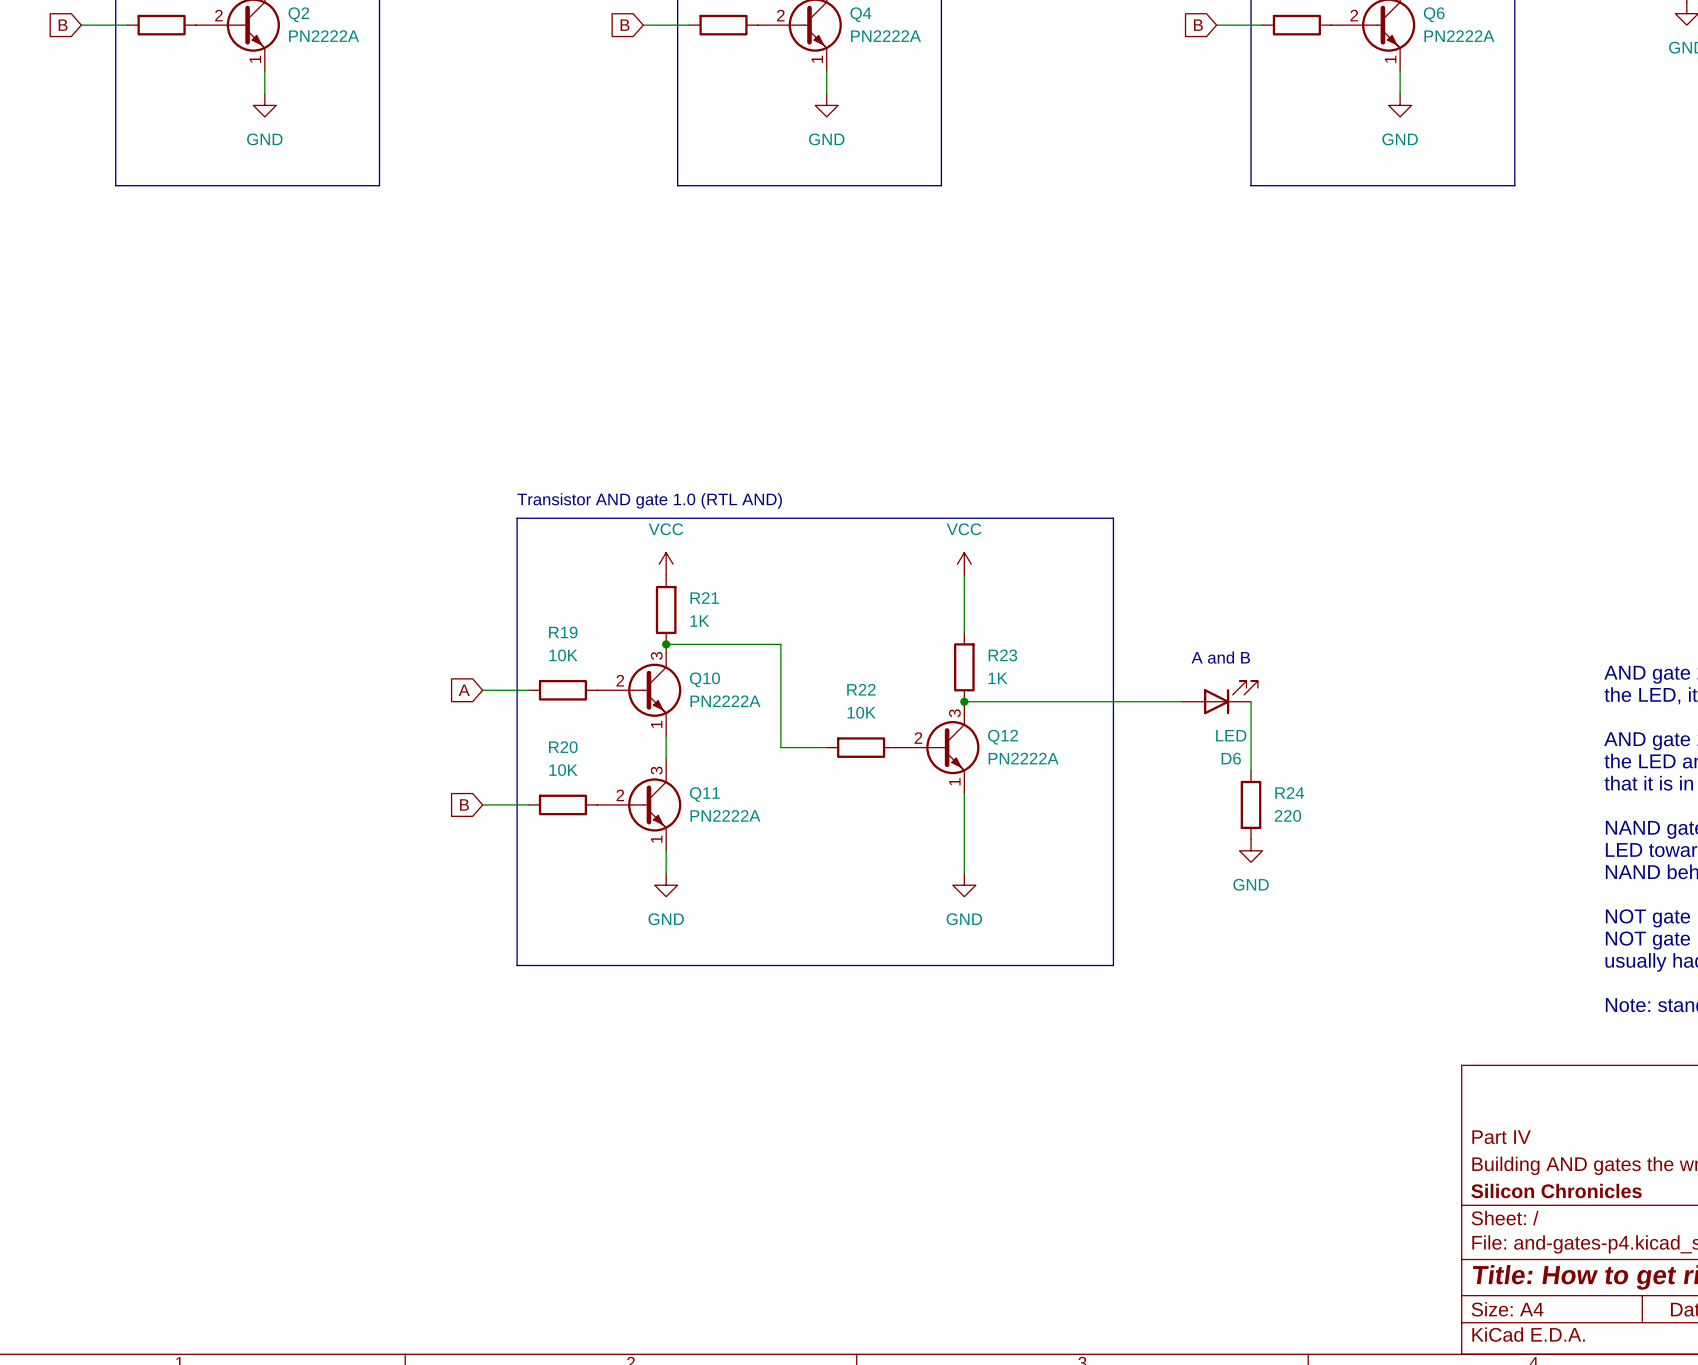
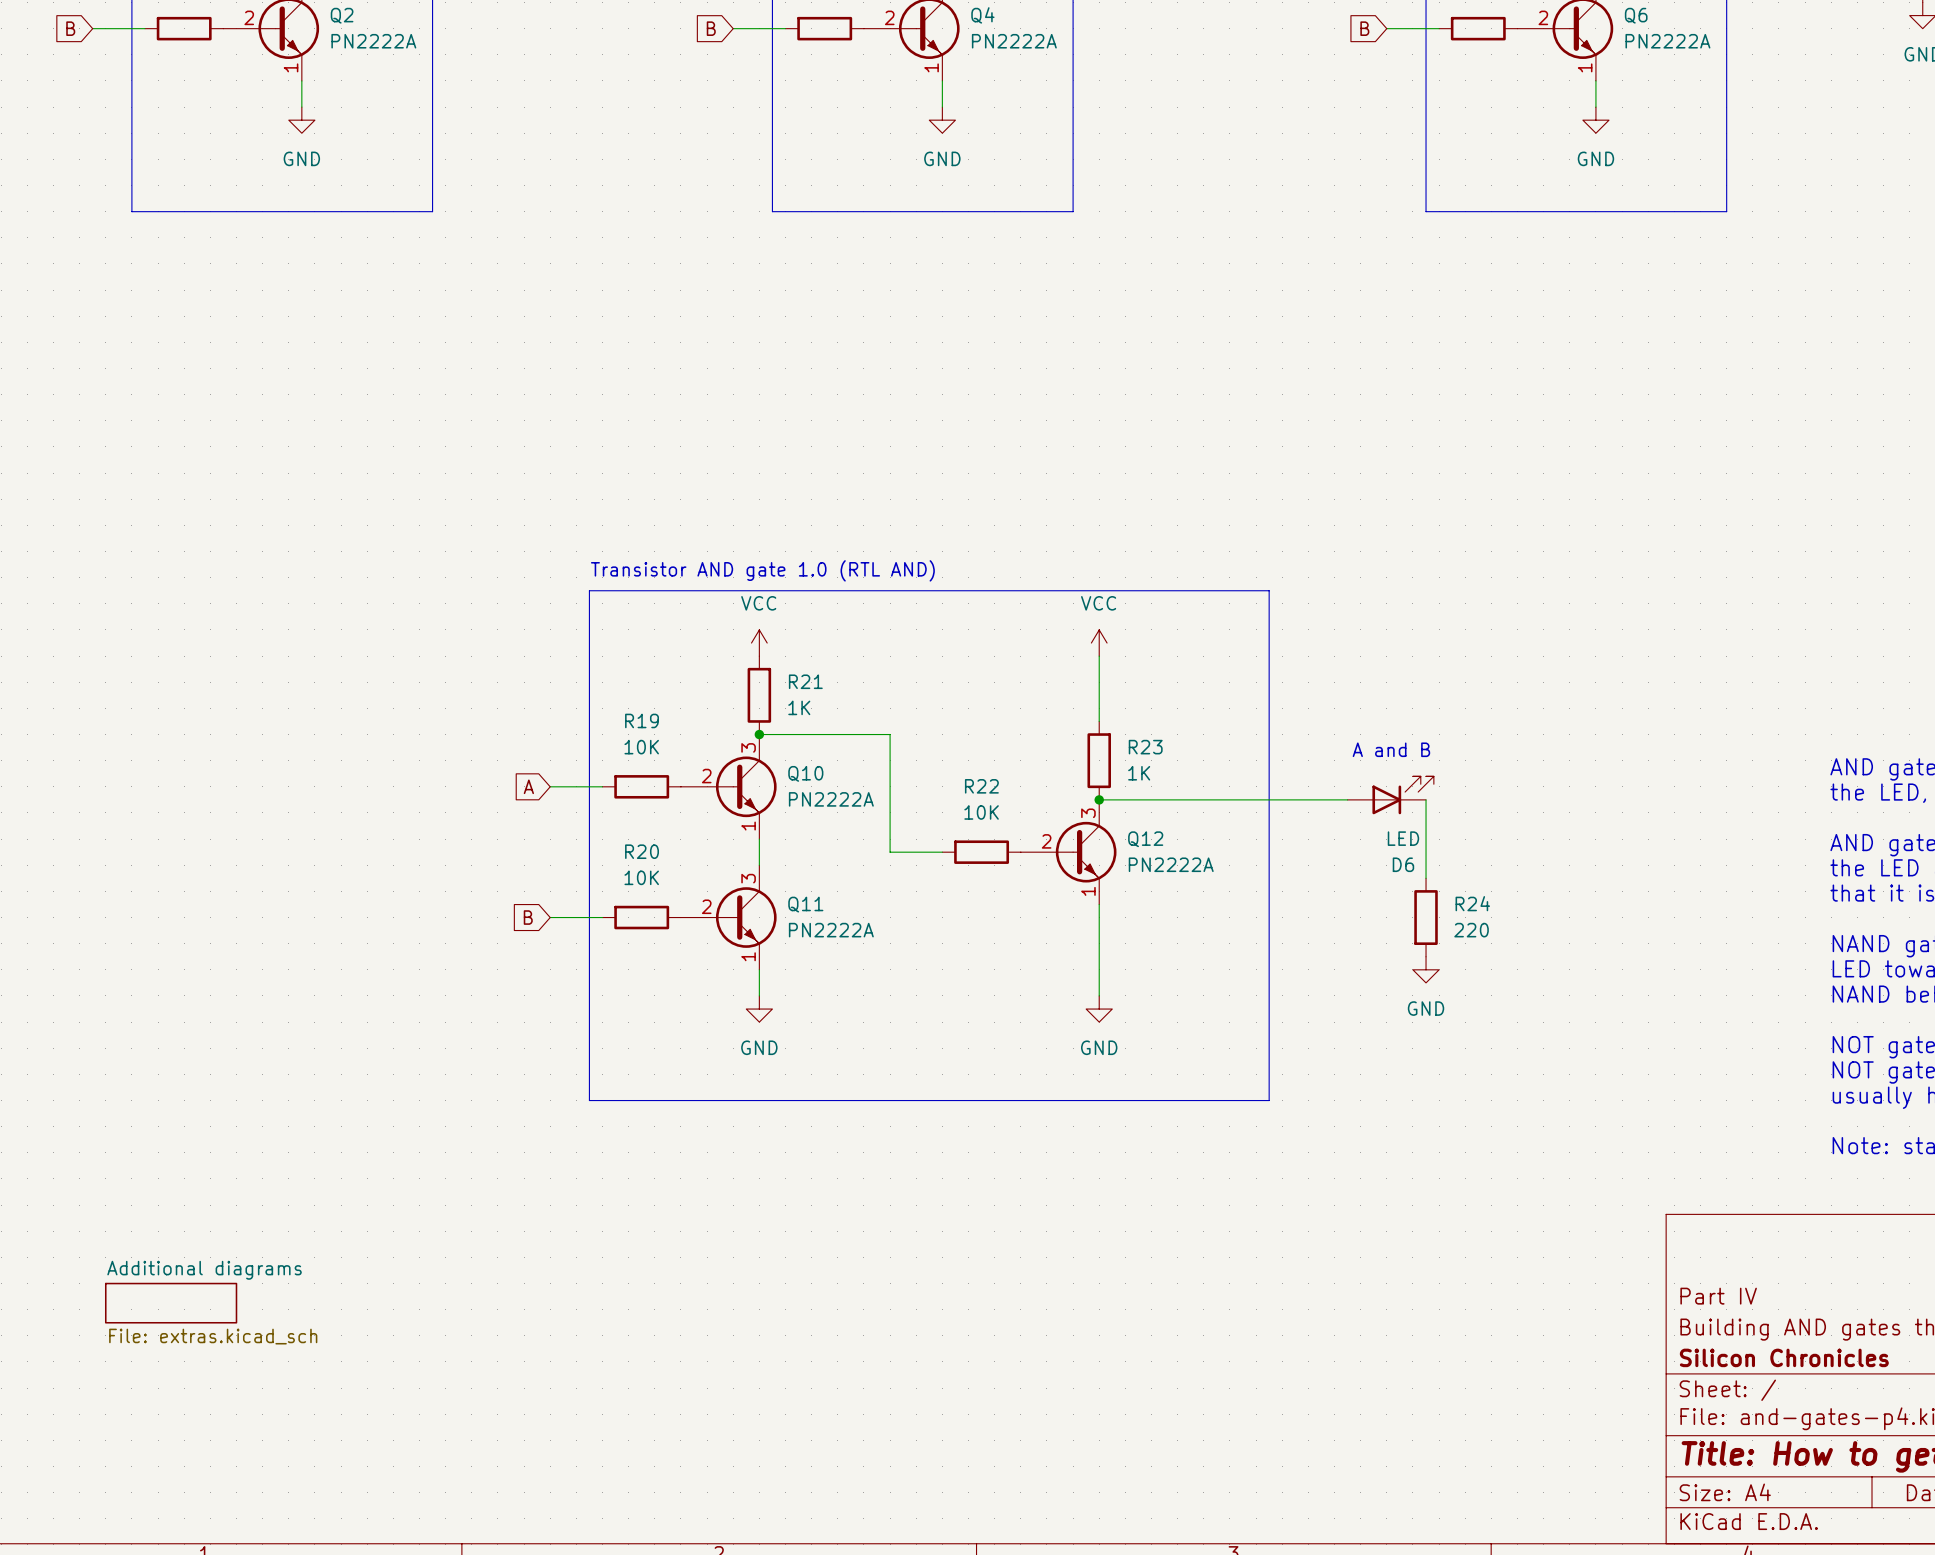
sheet Additional diagrams: none -> File: extras.kicad_sch (171, 1303)

